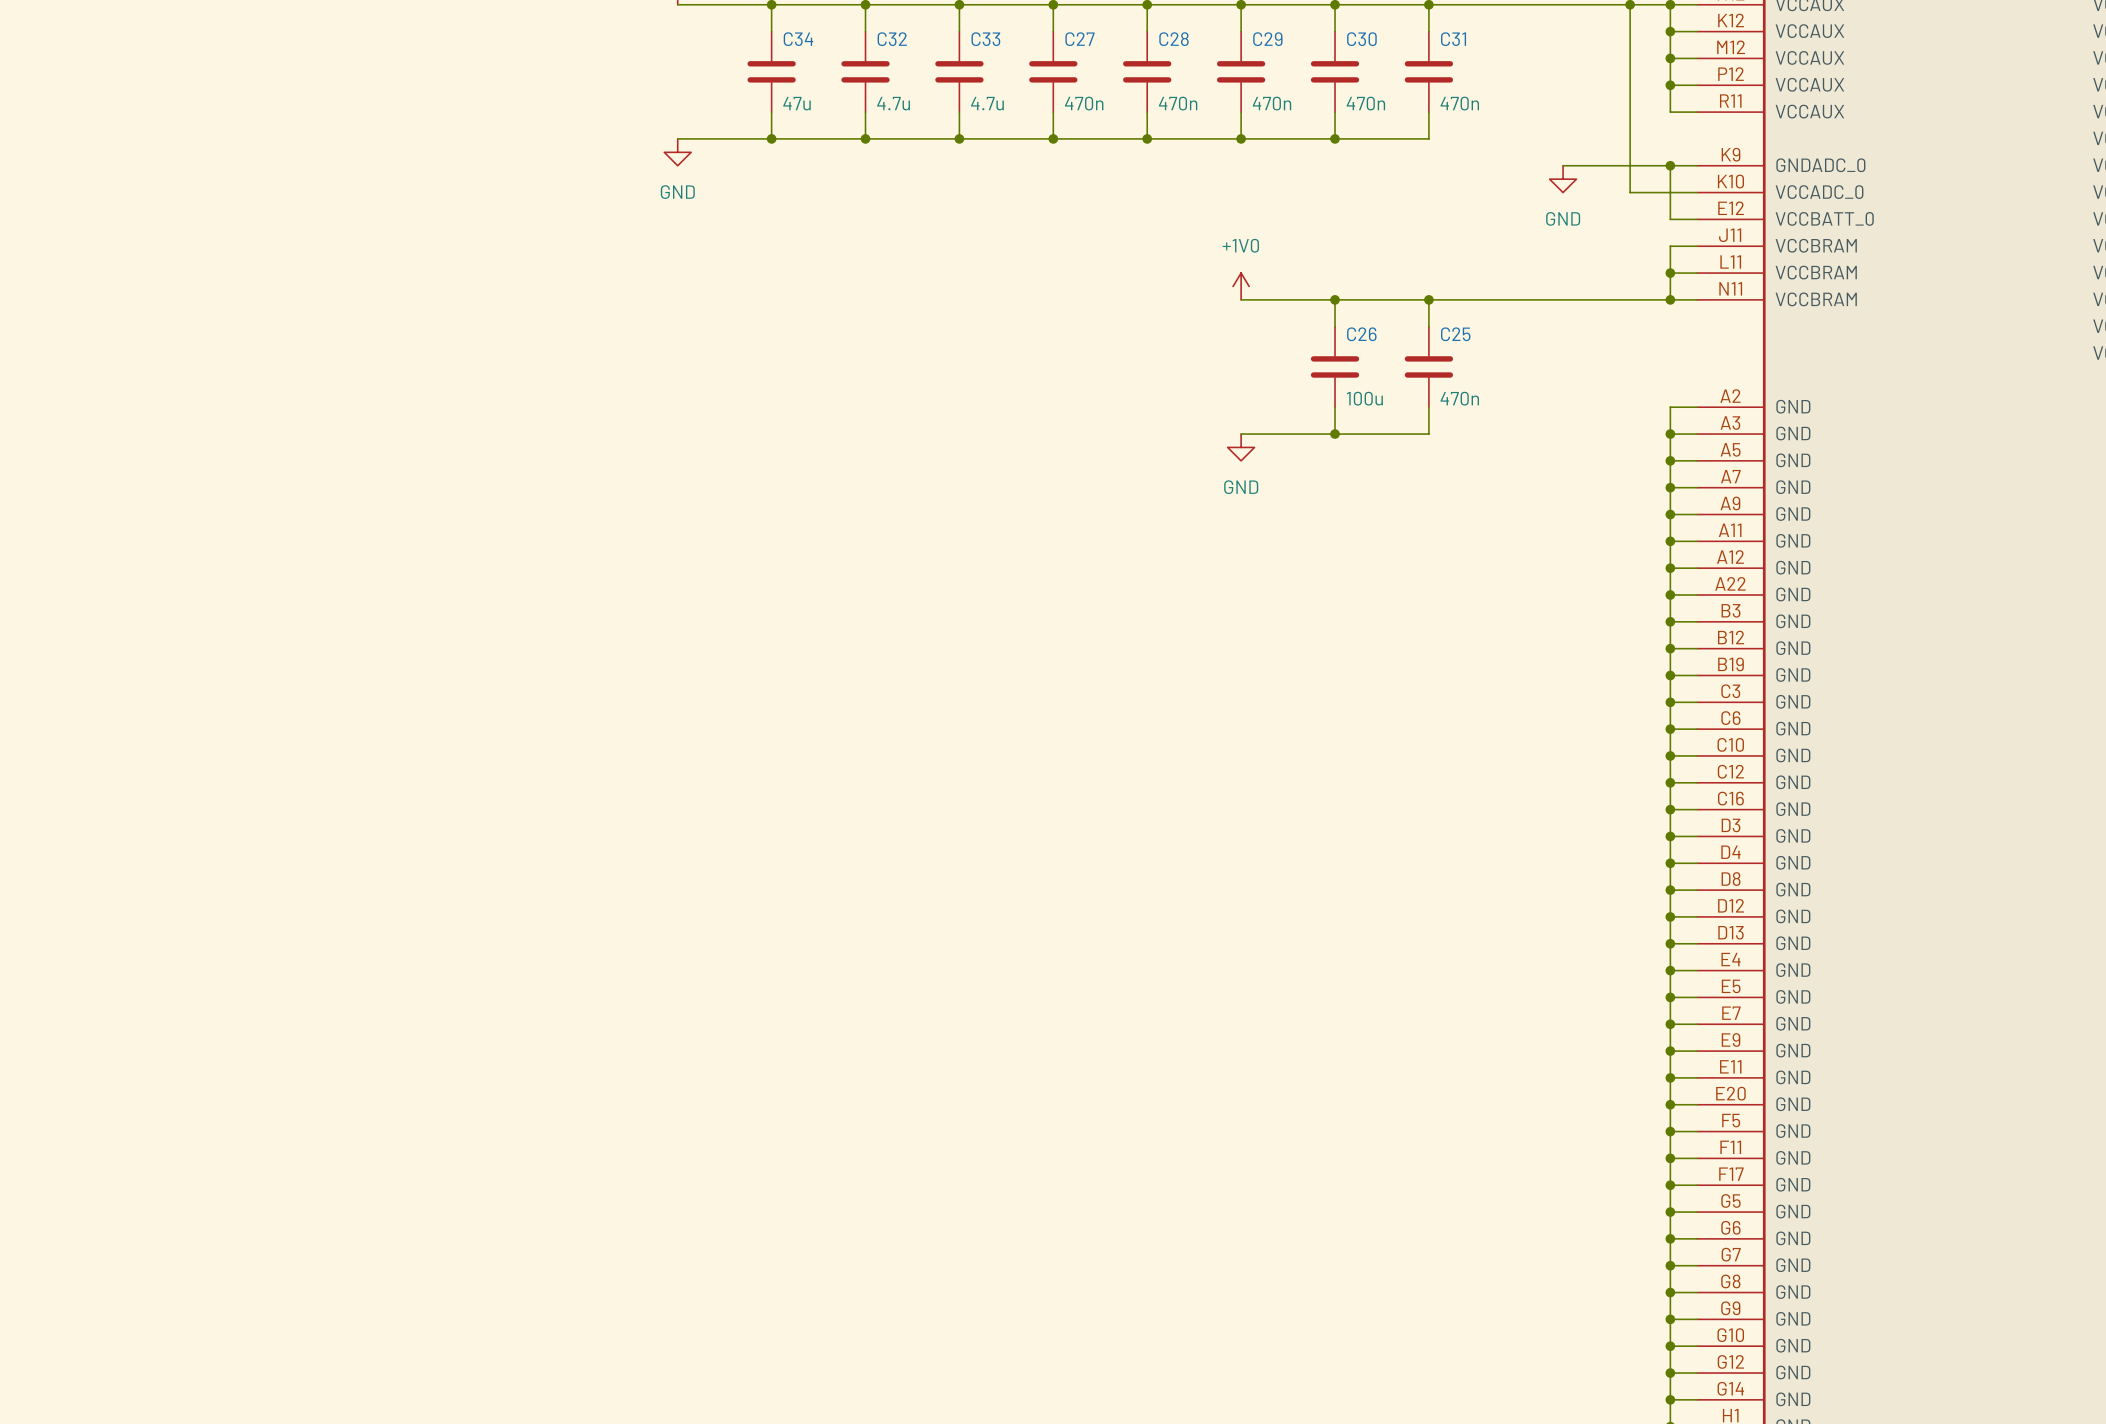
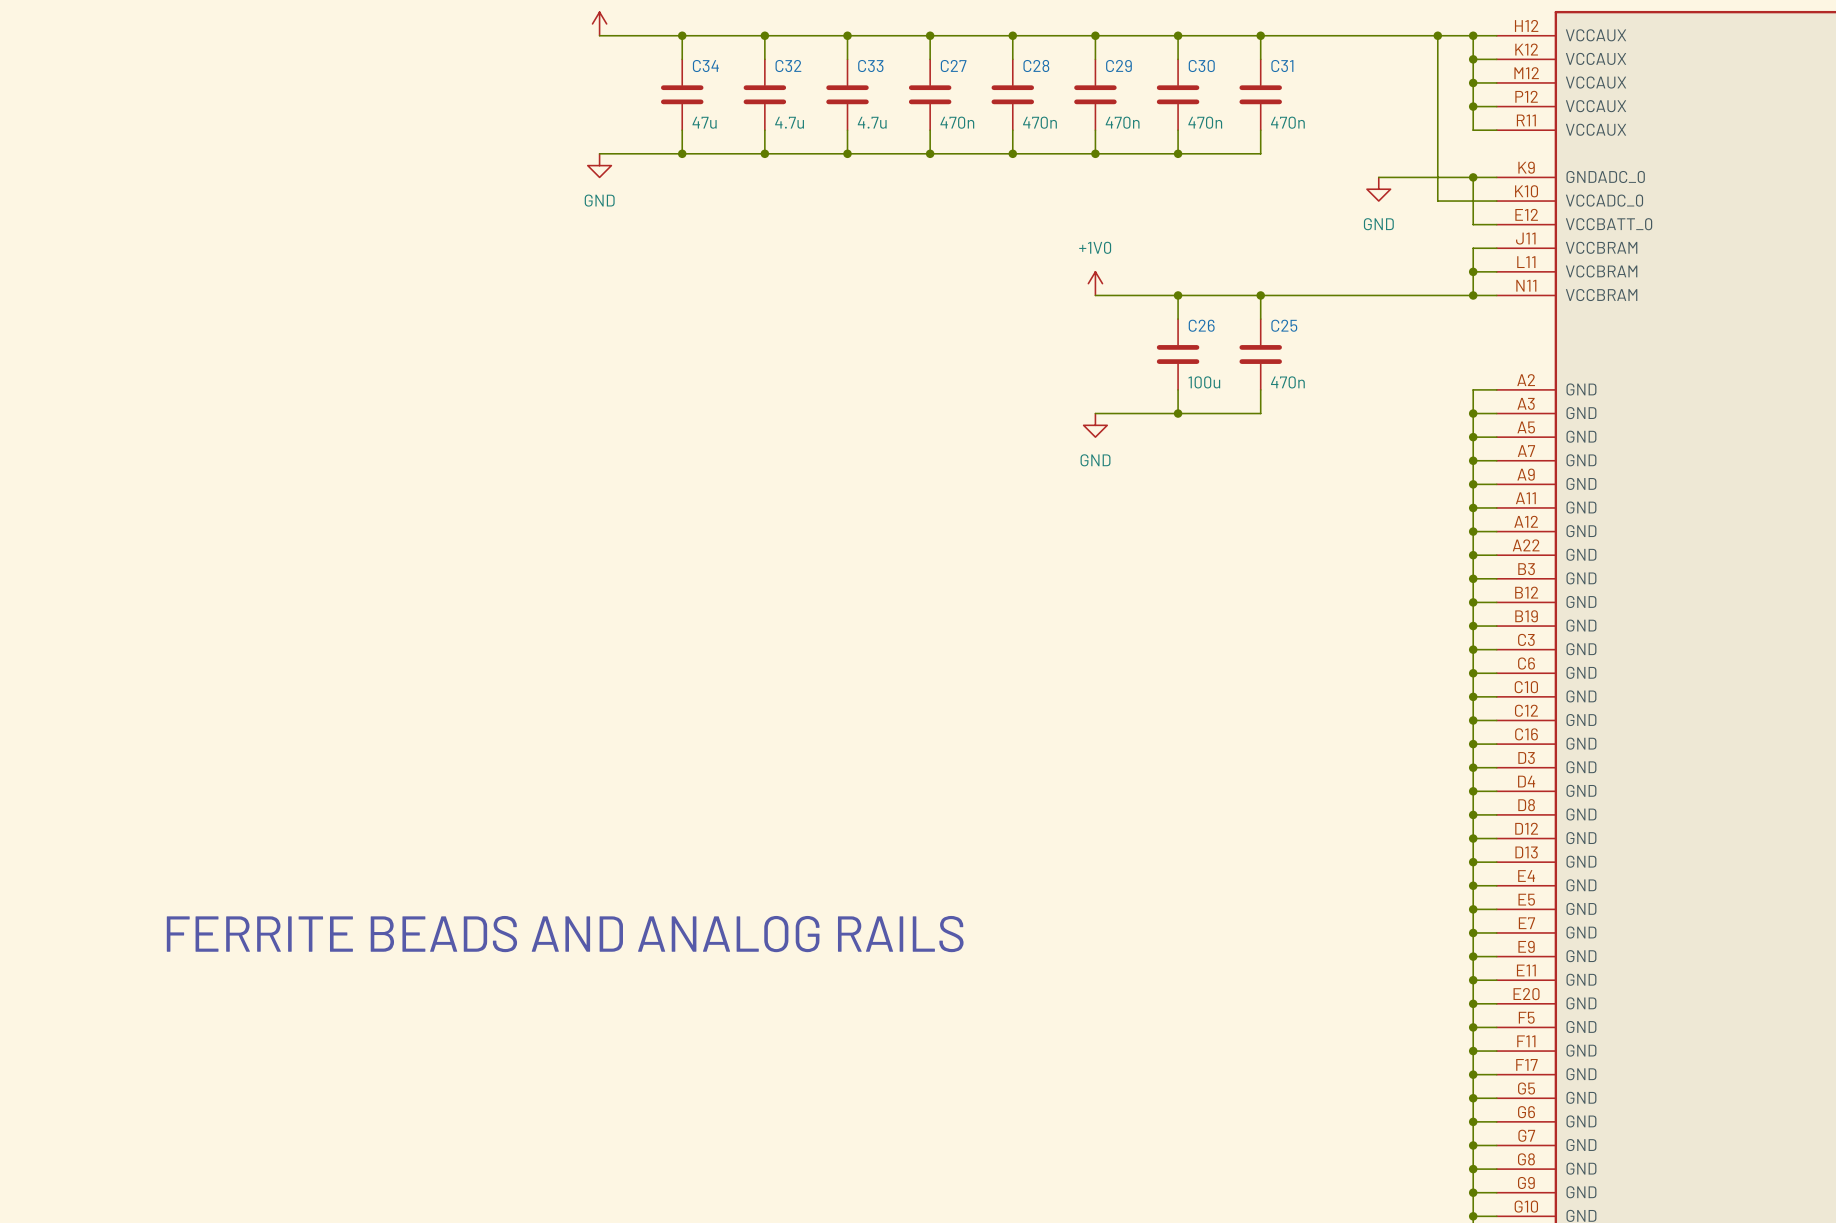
text: none -> FERRITE BEADS AND ANALOG RAILS (565, 934)

